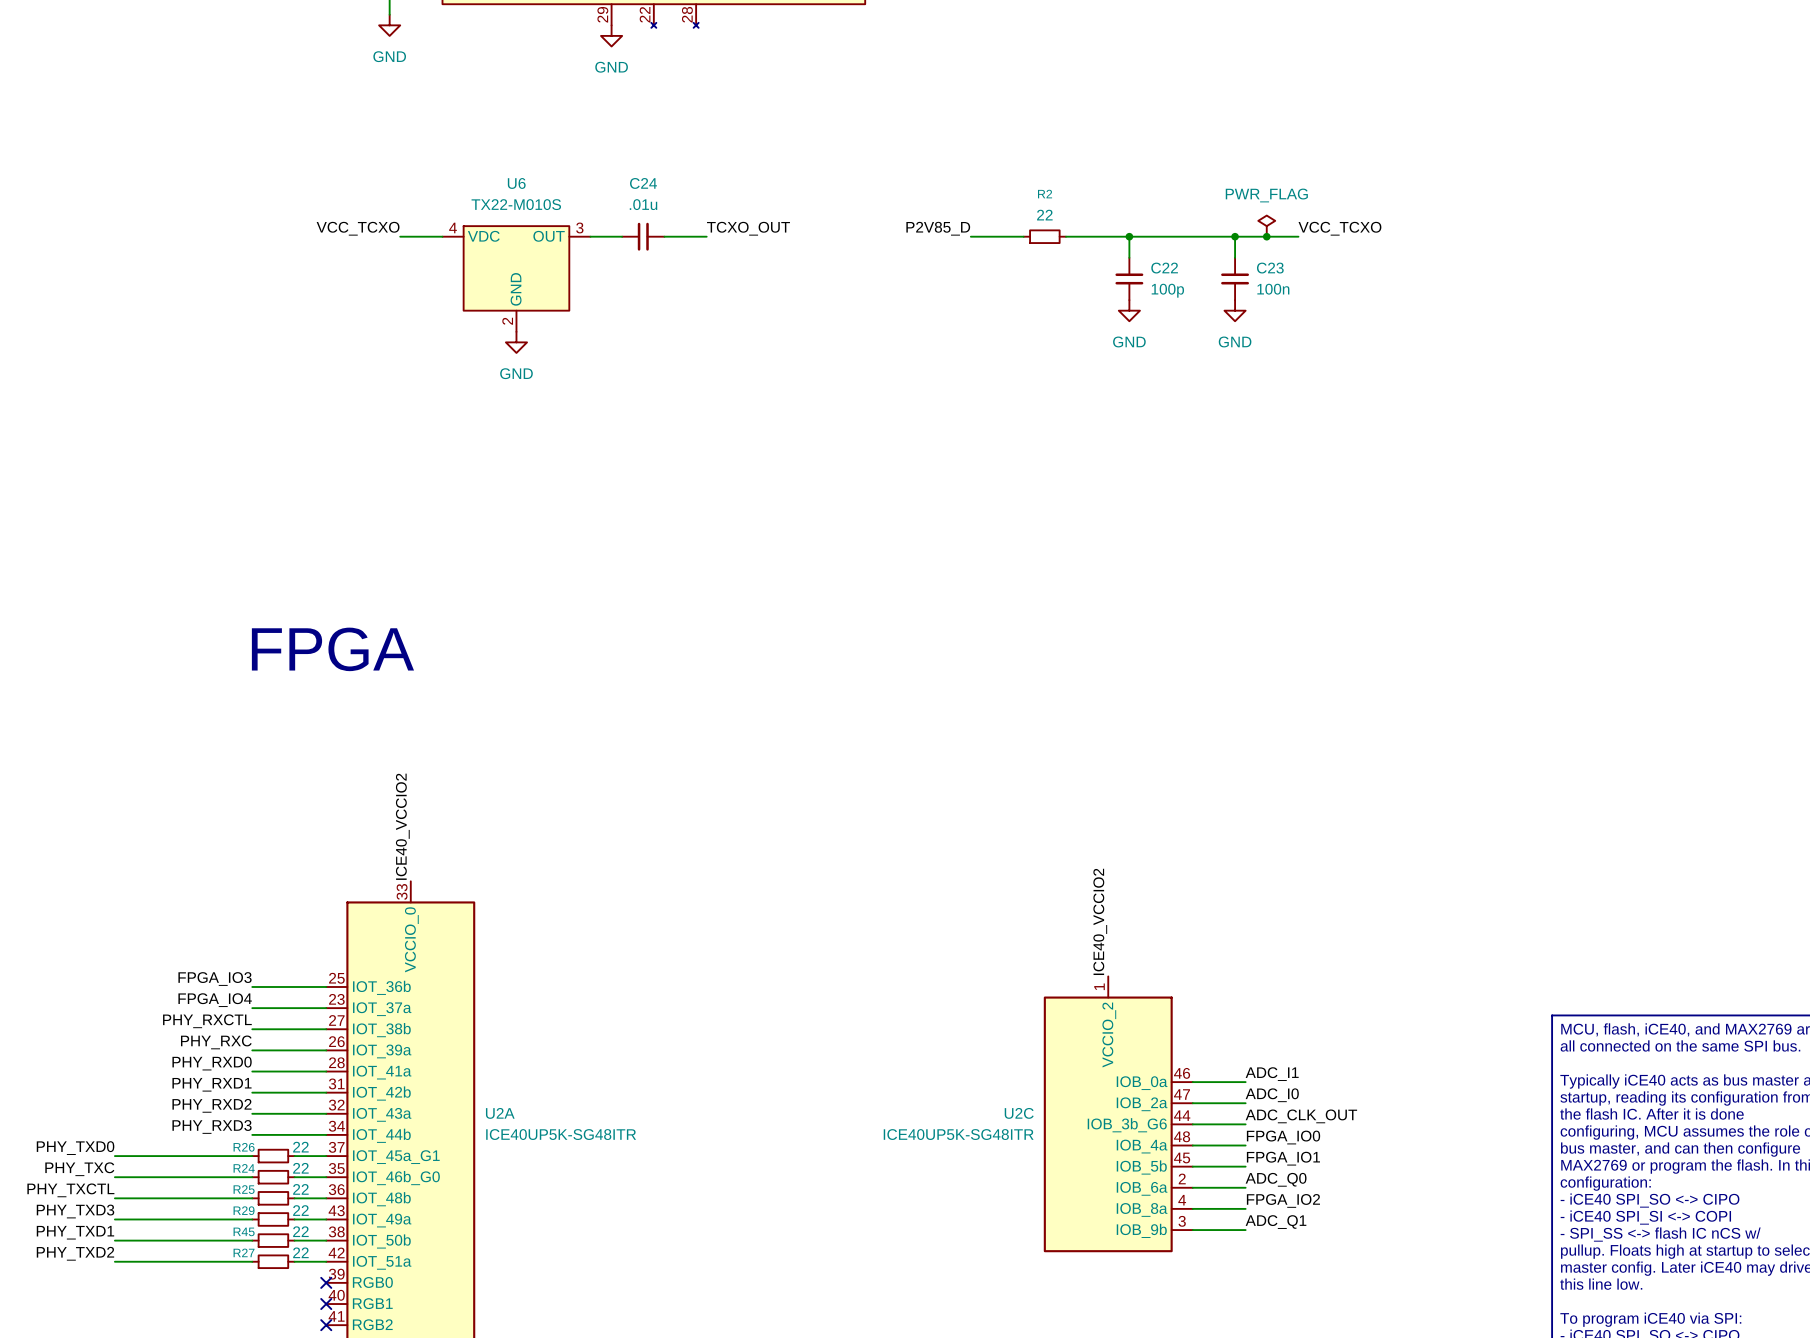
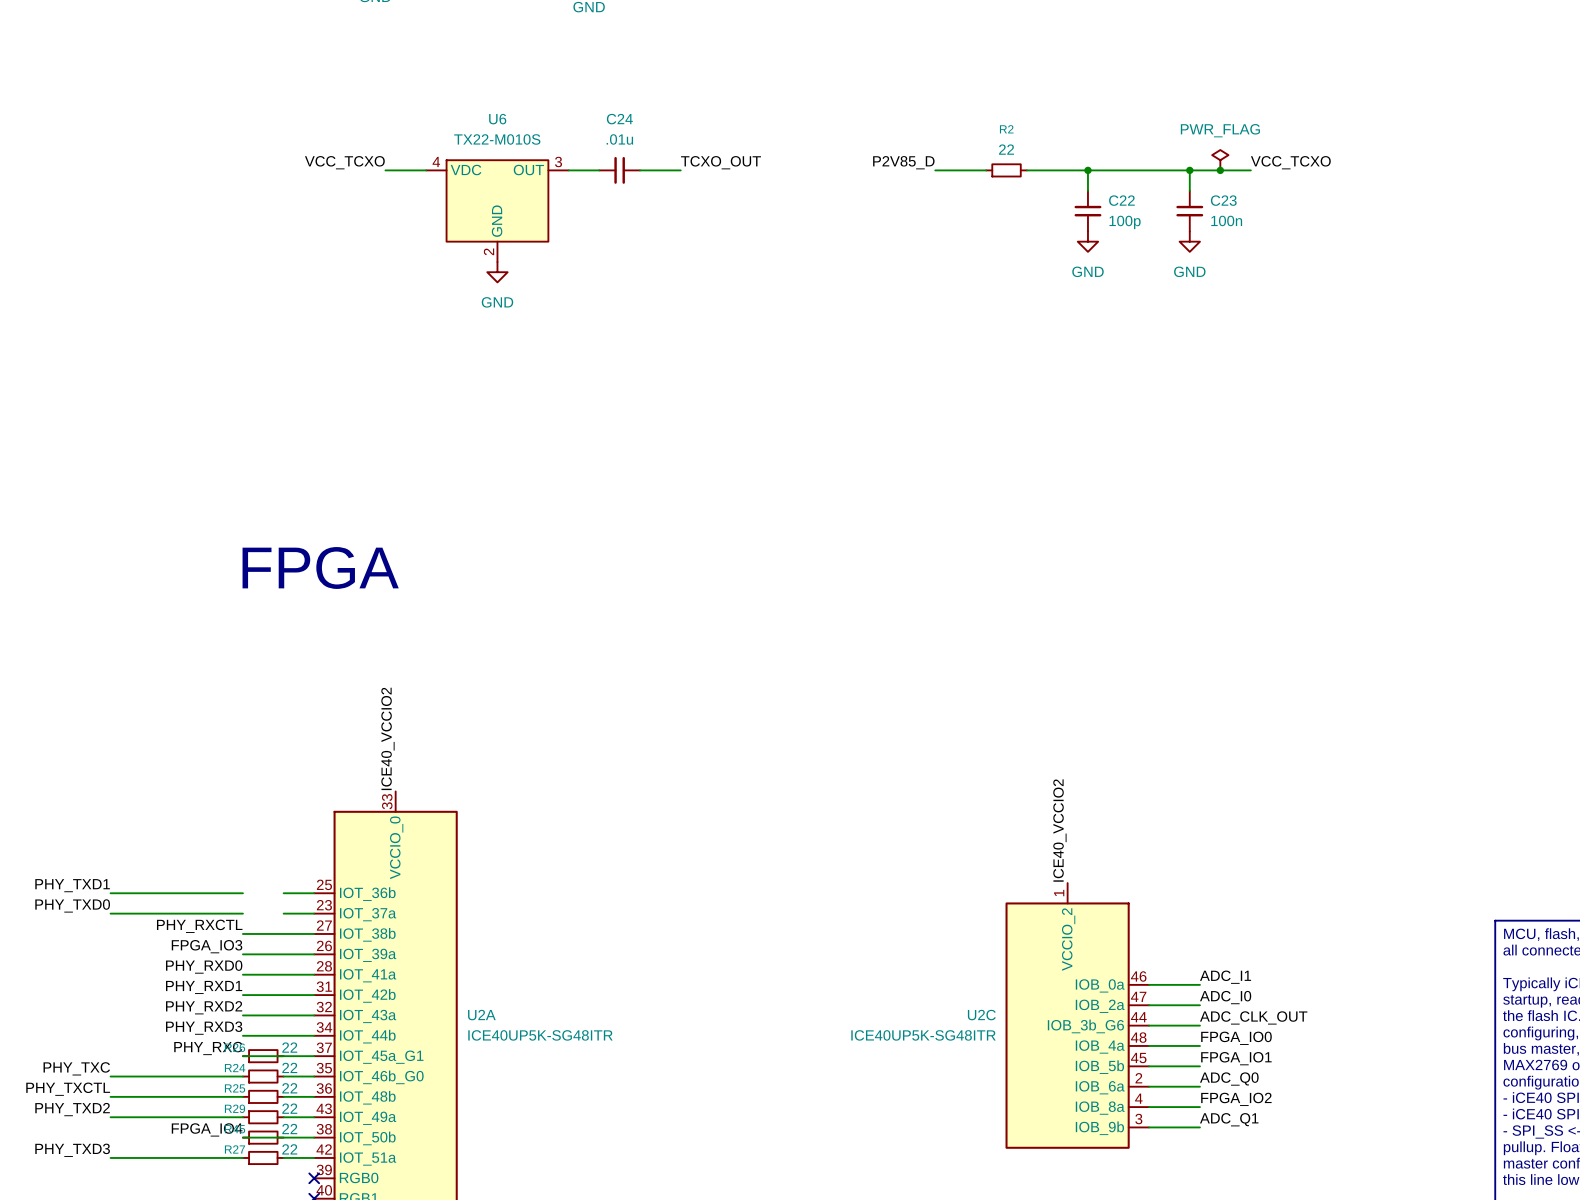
label: none -> PHY_TXD1 (72, 885)
label: FPGA_IO3 (215, 979) -> none
wire: (252, 986) (294, 986) -> (242, 893) (110, 893)
label: FPGA_IO4 (215, 1000) -> none
wire: (252, 1008) (294, 1008) -> (242, 913) (110, 913)
label: PHY_RXC (216, 1042) -> FPGA_IO3 (207, 946)
label position: PHY_TXD0 (75, 1148) -> PHY_TXD0 (72, 905)
label: none -> PHY_RXC (208, 1048)
wire: (114, 1156) (252, 1156) -> (283, 1056) (242, 1056)
label: PHY_TXD3 (75, 1211) -> PHY_TXD2 (72, 1109)
label: PHY_TXD1 (75, 1232) -> none
label: none -> FPGA_IO4 (207, 1129)
wire: (114, 1240) (252, 1240) -> (283, 1137) (242, 1137)
label: PHY_TXD2 (75, 1253) -> PHY_TXD3 (72, 1150)

